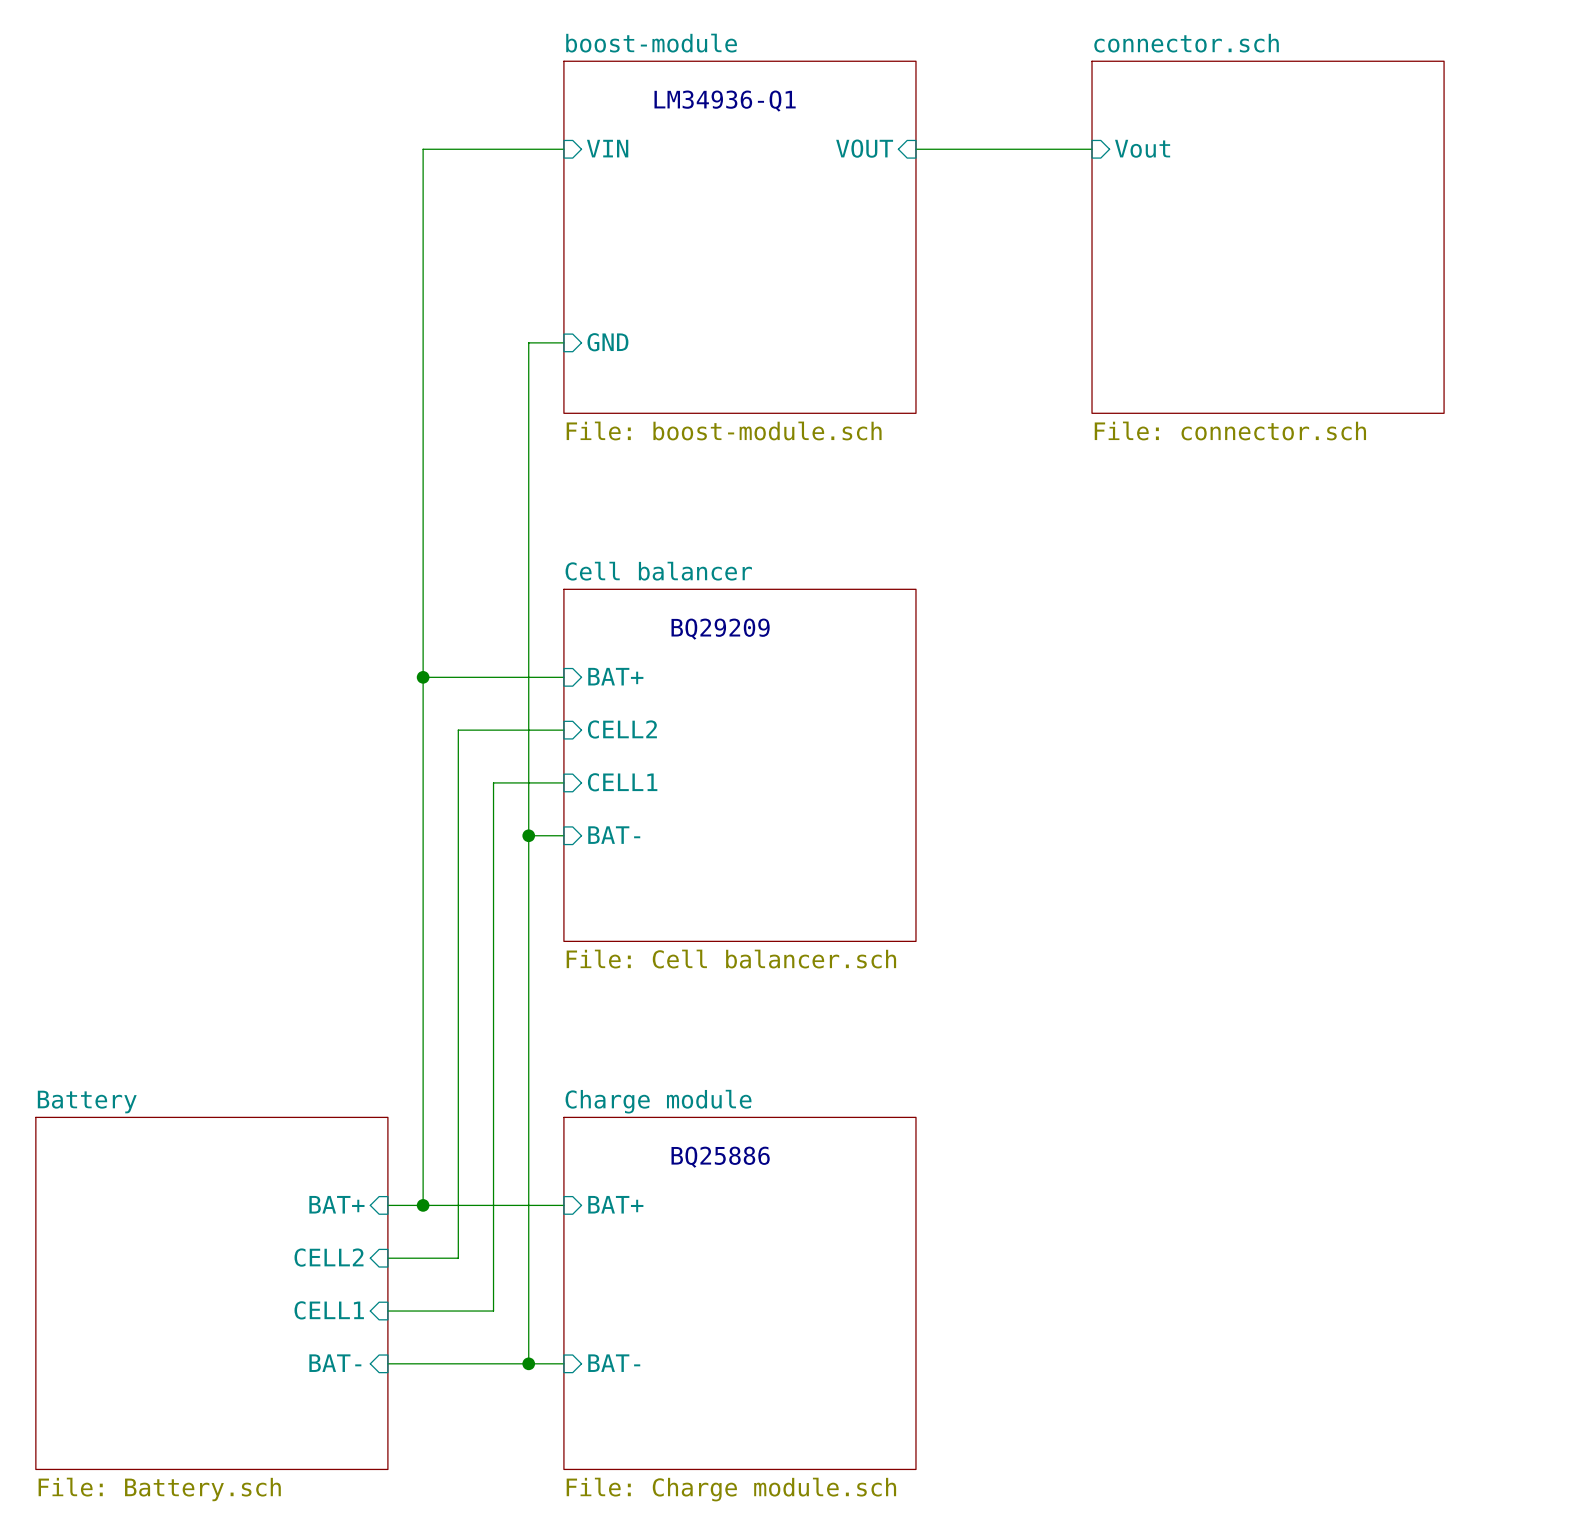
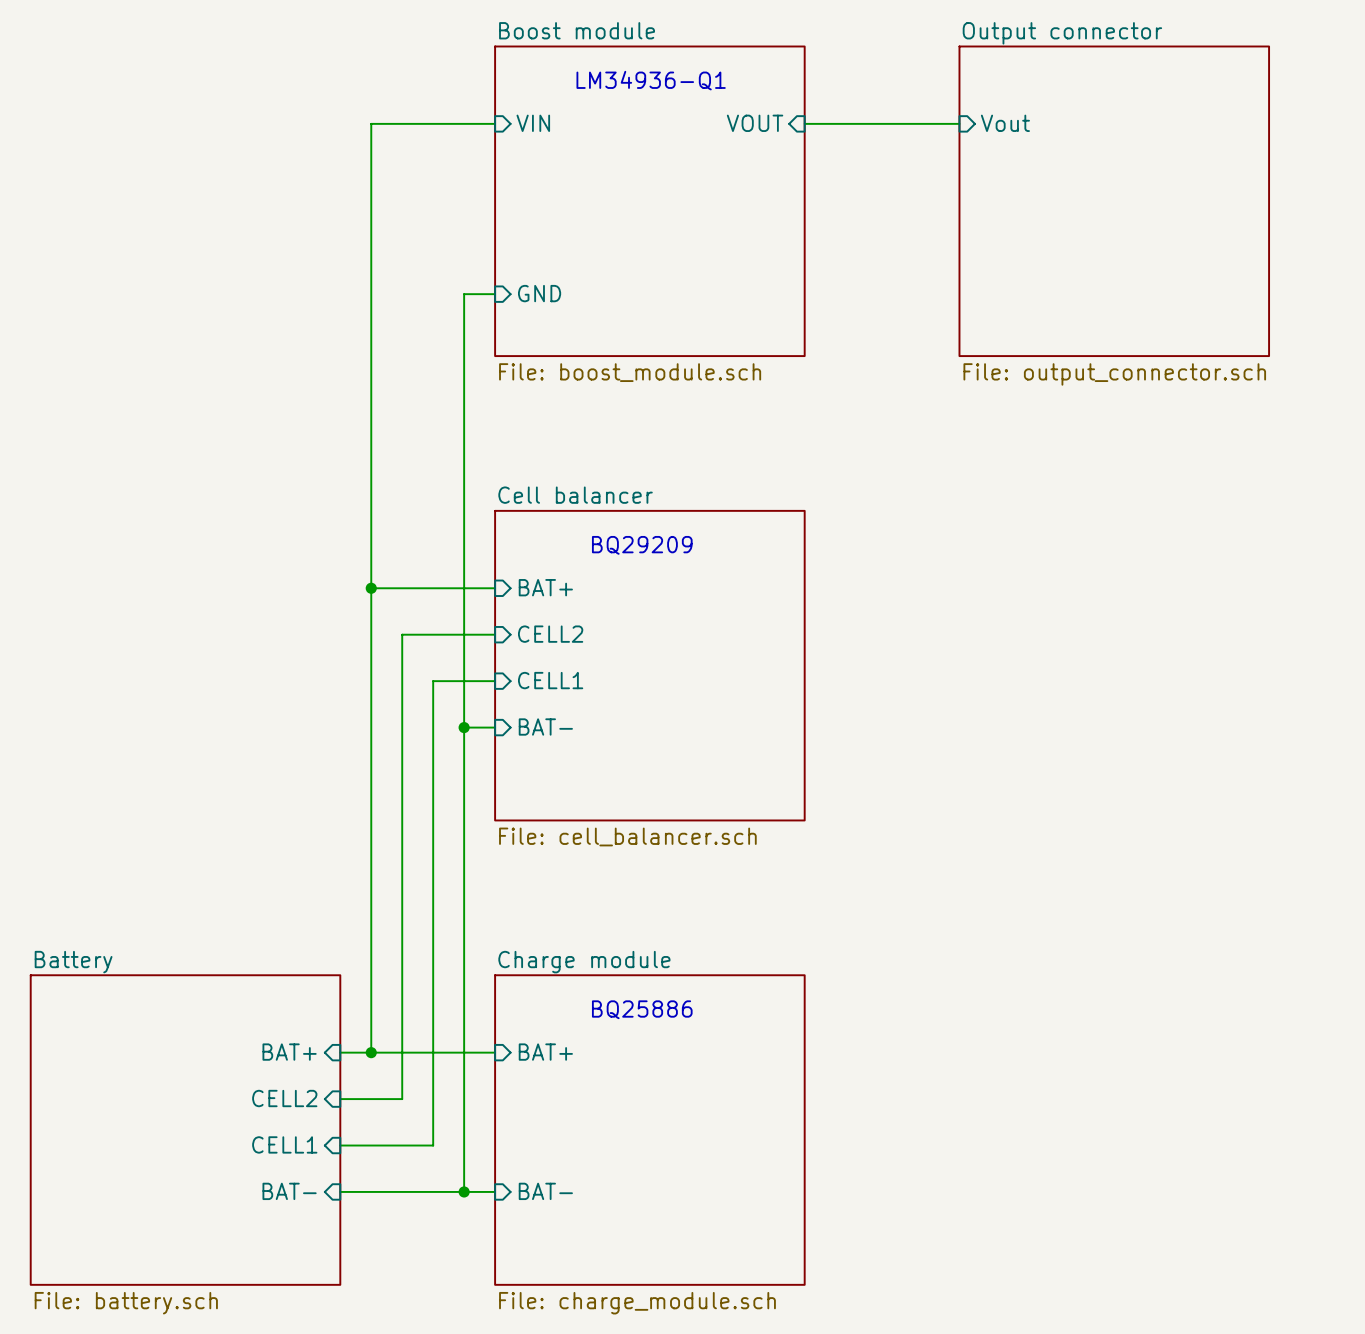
sheet boost-module name: boost-module (651, 43) -> Boost module (577, 30)
sheet connector.sch name: connector.sch (1186, 43) -> Output connector (1062, 33)
sheet boost-module value: File: boost-module.sch (724, 430) -> File: boost_module.sch (630, 372)
sheet connector.sch value: File: connector.sch (1230, 430) -> File: output_connector.sch (1114, 374)
sheet Cell balancer value: File: Cell balancer.sch (731, 959) -> File: cell_balancer.sch (627, 836)
sheet Battery value: File: Battery.sch (159, 1489) -> File: battery.sch (126, 1303)
sheet Charge module value: File: Charge module.sch (731, 1489) -> File: charge_module.sch (637, 1303)

